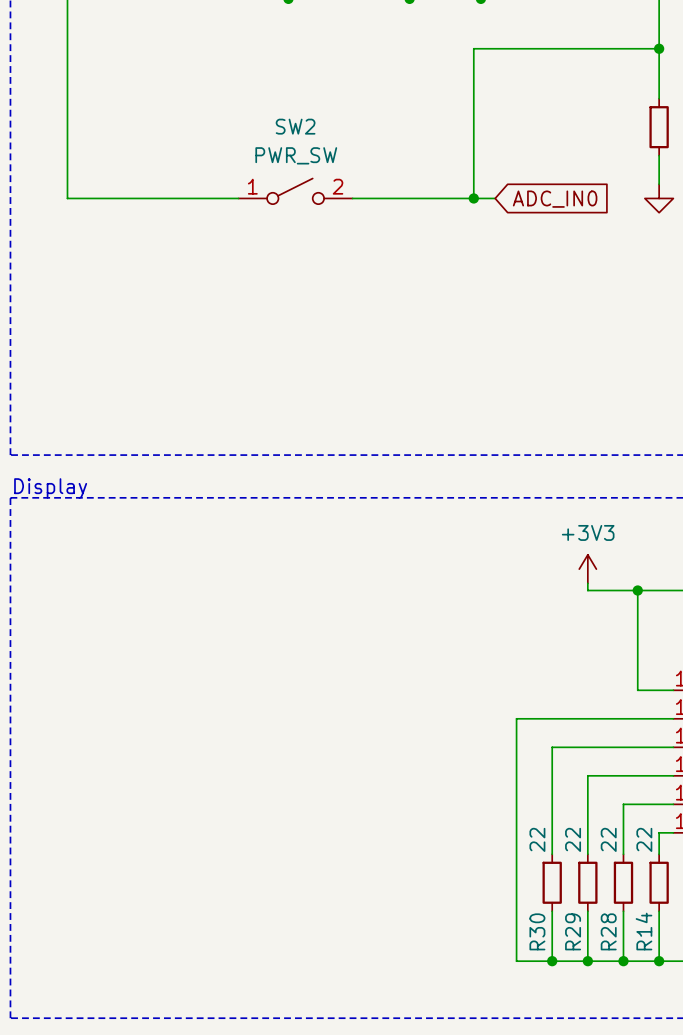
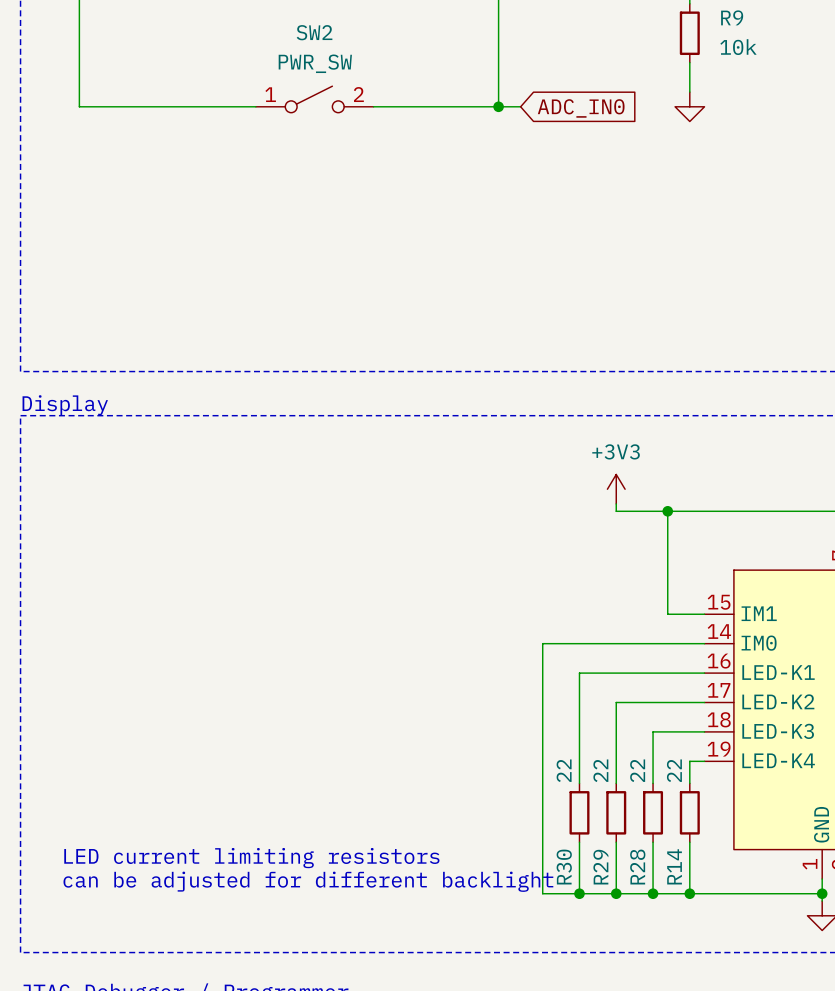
text: none -> LED current limiting resistors (251, 858)
text: none -> can be adjusted for different backlight (308, 881)

